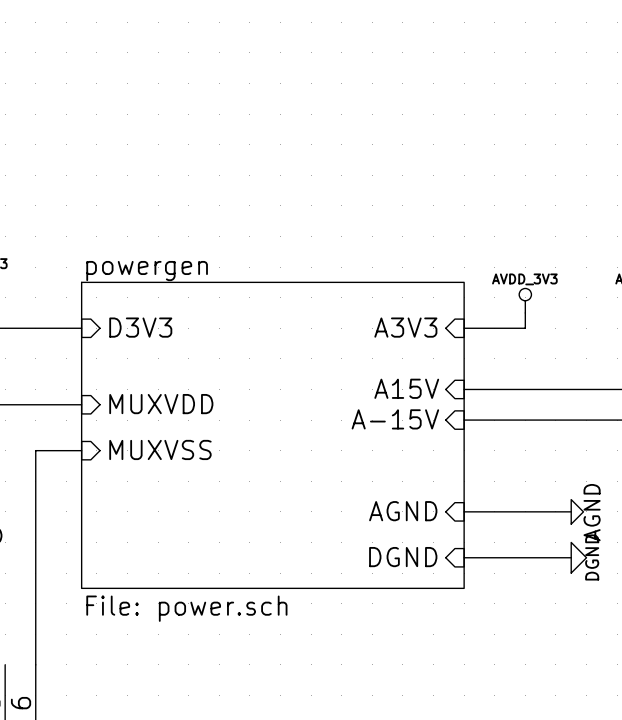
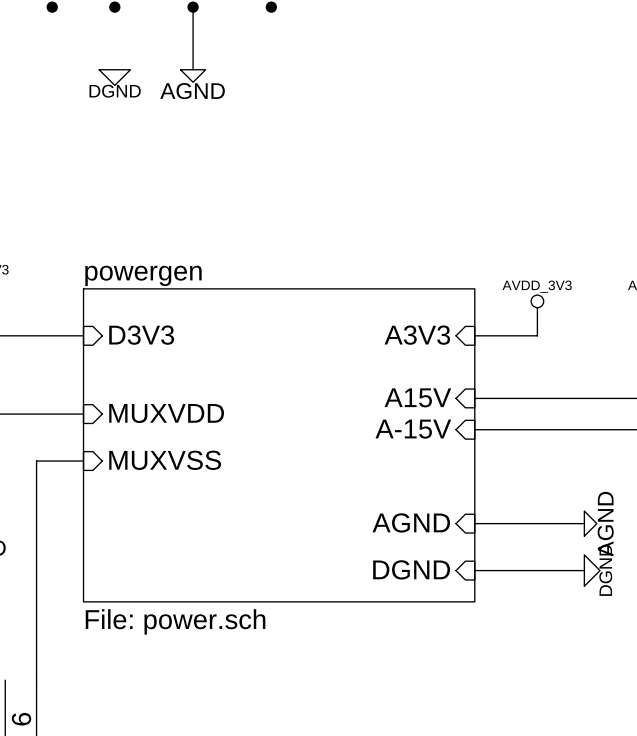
junction: none -> (52, 7)
junction: none -> (114, 7)
wire: none -> (193, 7) (193, 69)
junction: none -> (193, 7)
junction: none -> (271, 7)
power symbol: none -> AGND (193, 76)
power symbol: none -> DGND (114, 77)

